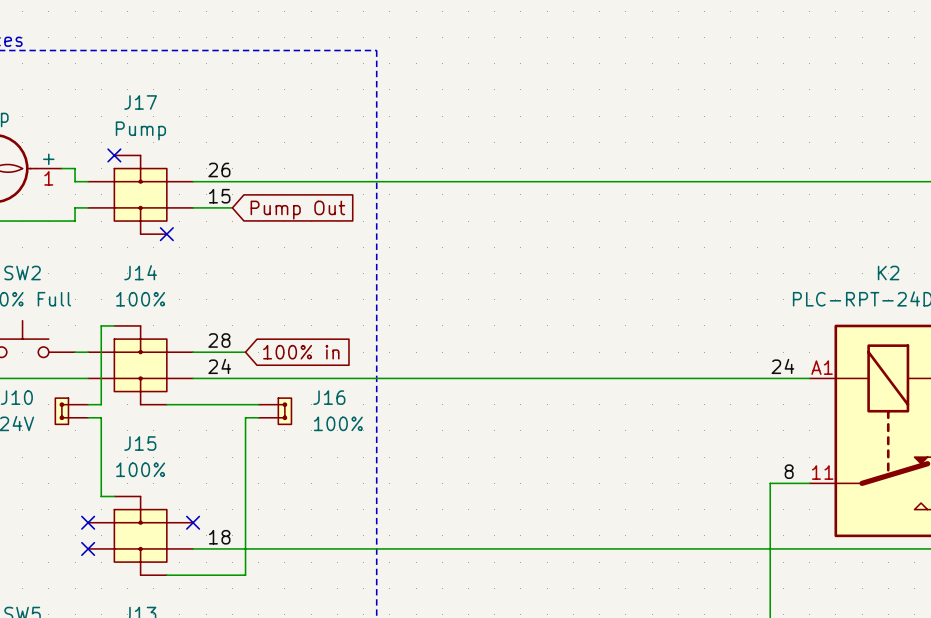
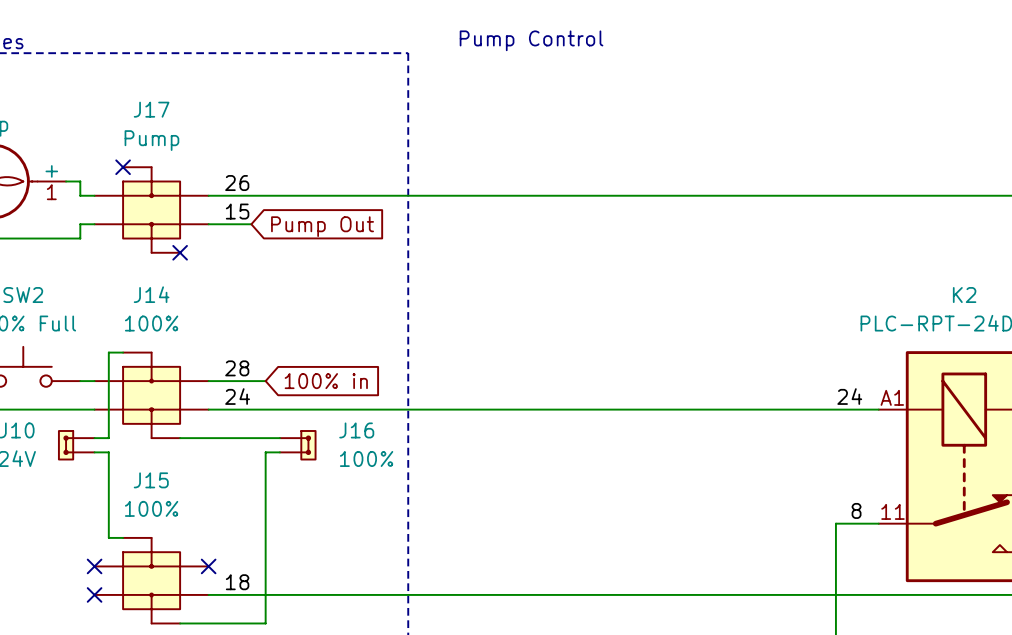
text: none -> Pump Control (531, 40)

